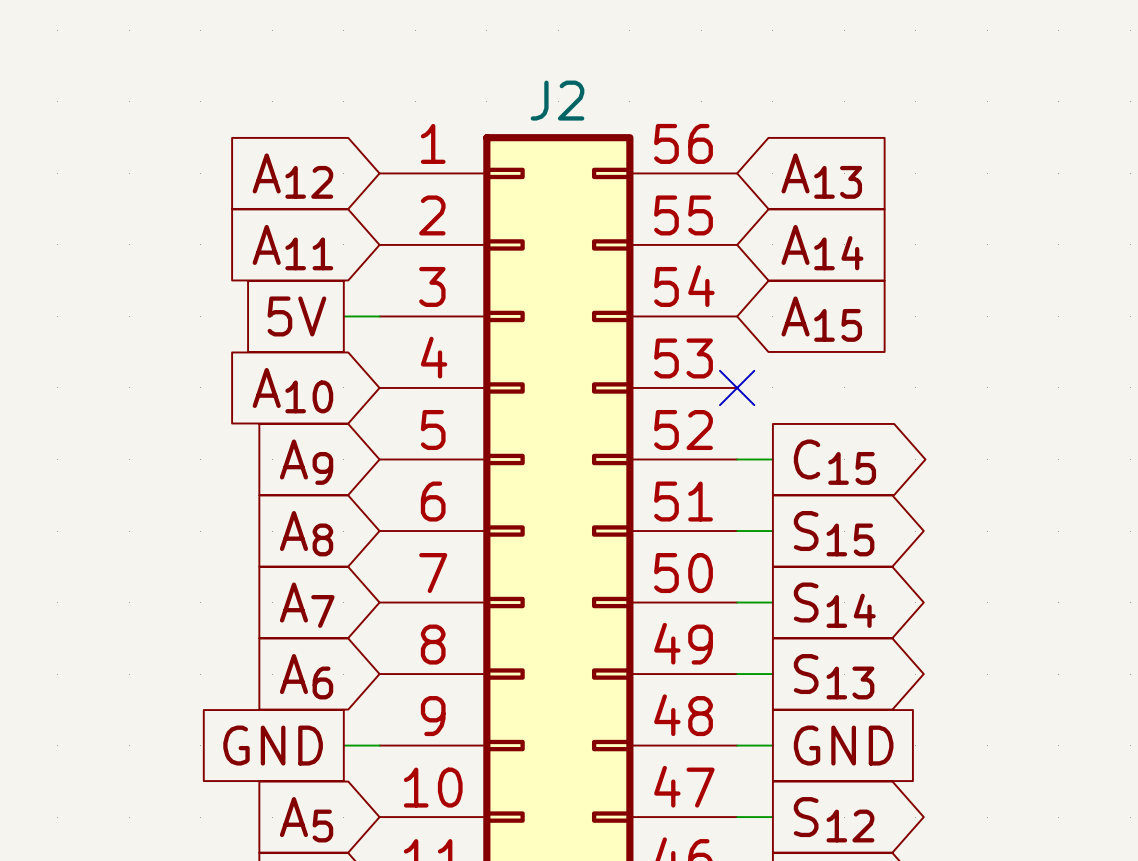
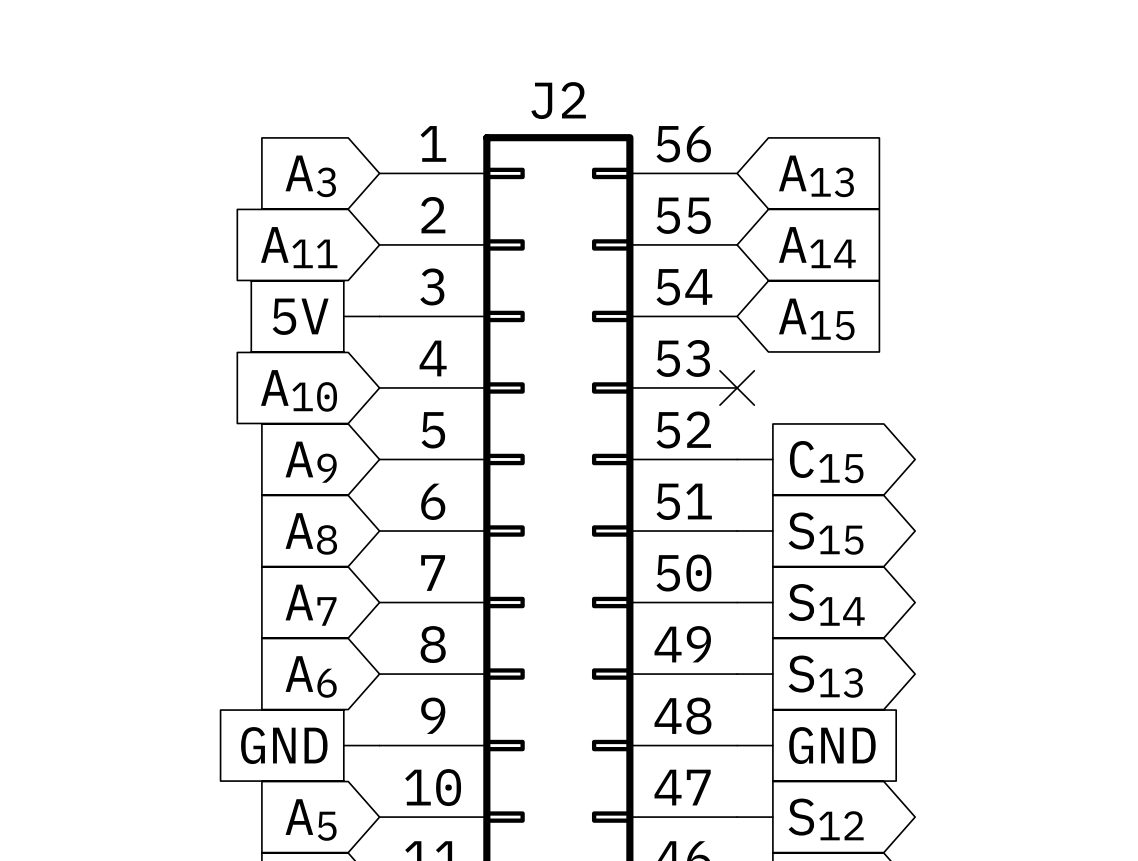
global label: A12 (292, 176) -> A3 (310, 176)

